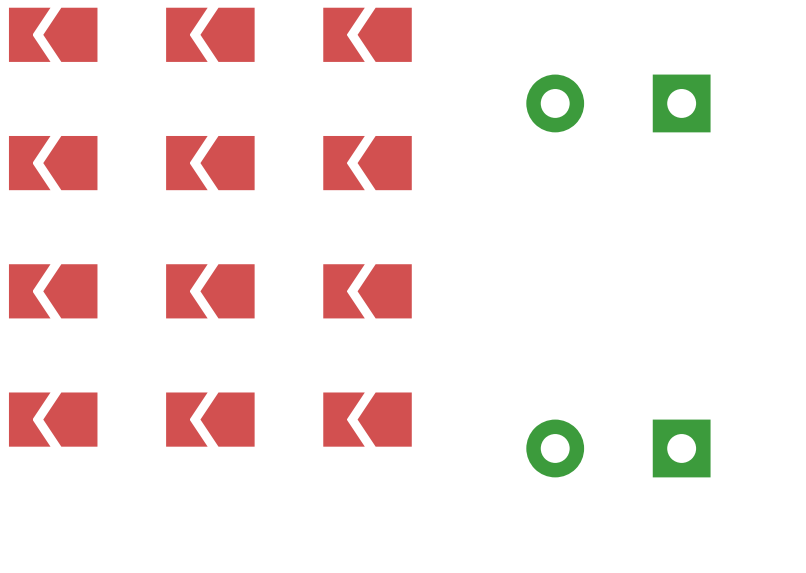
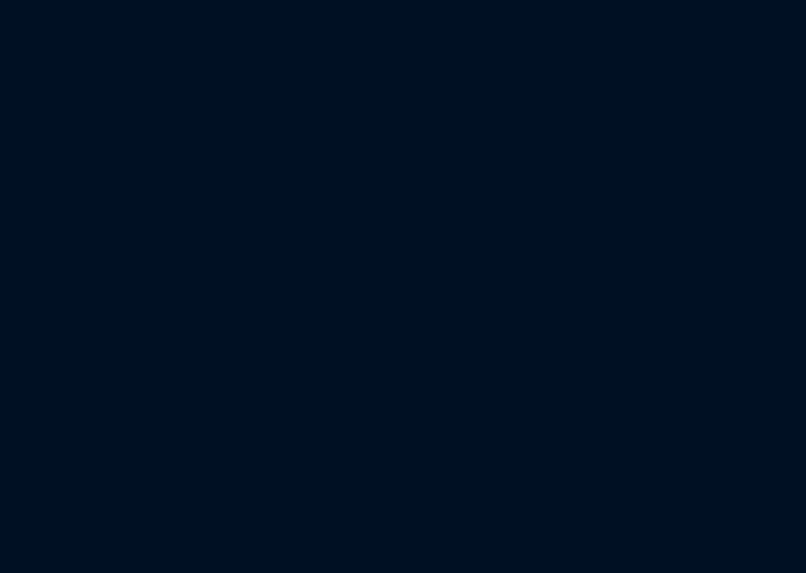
part: (53, 34) -> none
part: (210, 34) -> none
part: (367, 34) -> none
part: (618, 103) -> none
part: (53, 163) -> none
part: (210, 163) -> none
part: (367, 163) -> none
part: (53, 291) -> none
part: (210, 291) -> none
part: (367, 291) -> none
part: (53, 419) -> none
part: (210, 419) -> none
part: (367, 419) -> none
part: (618, 448) -> none

